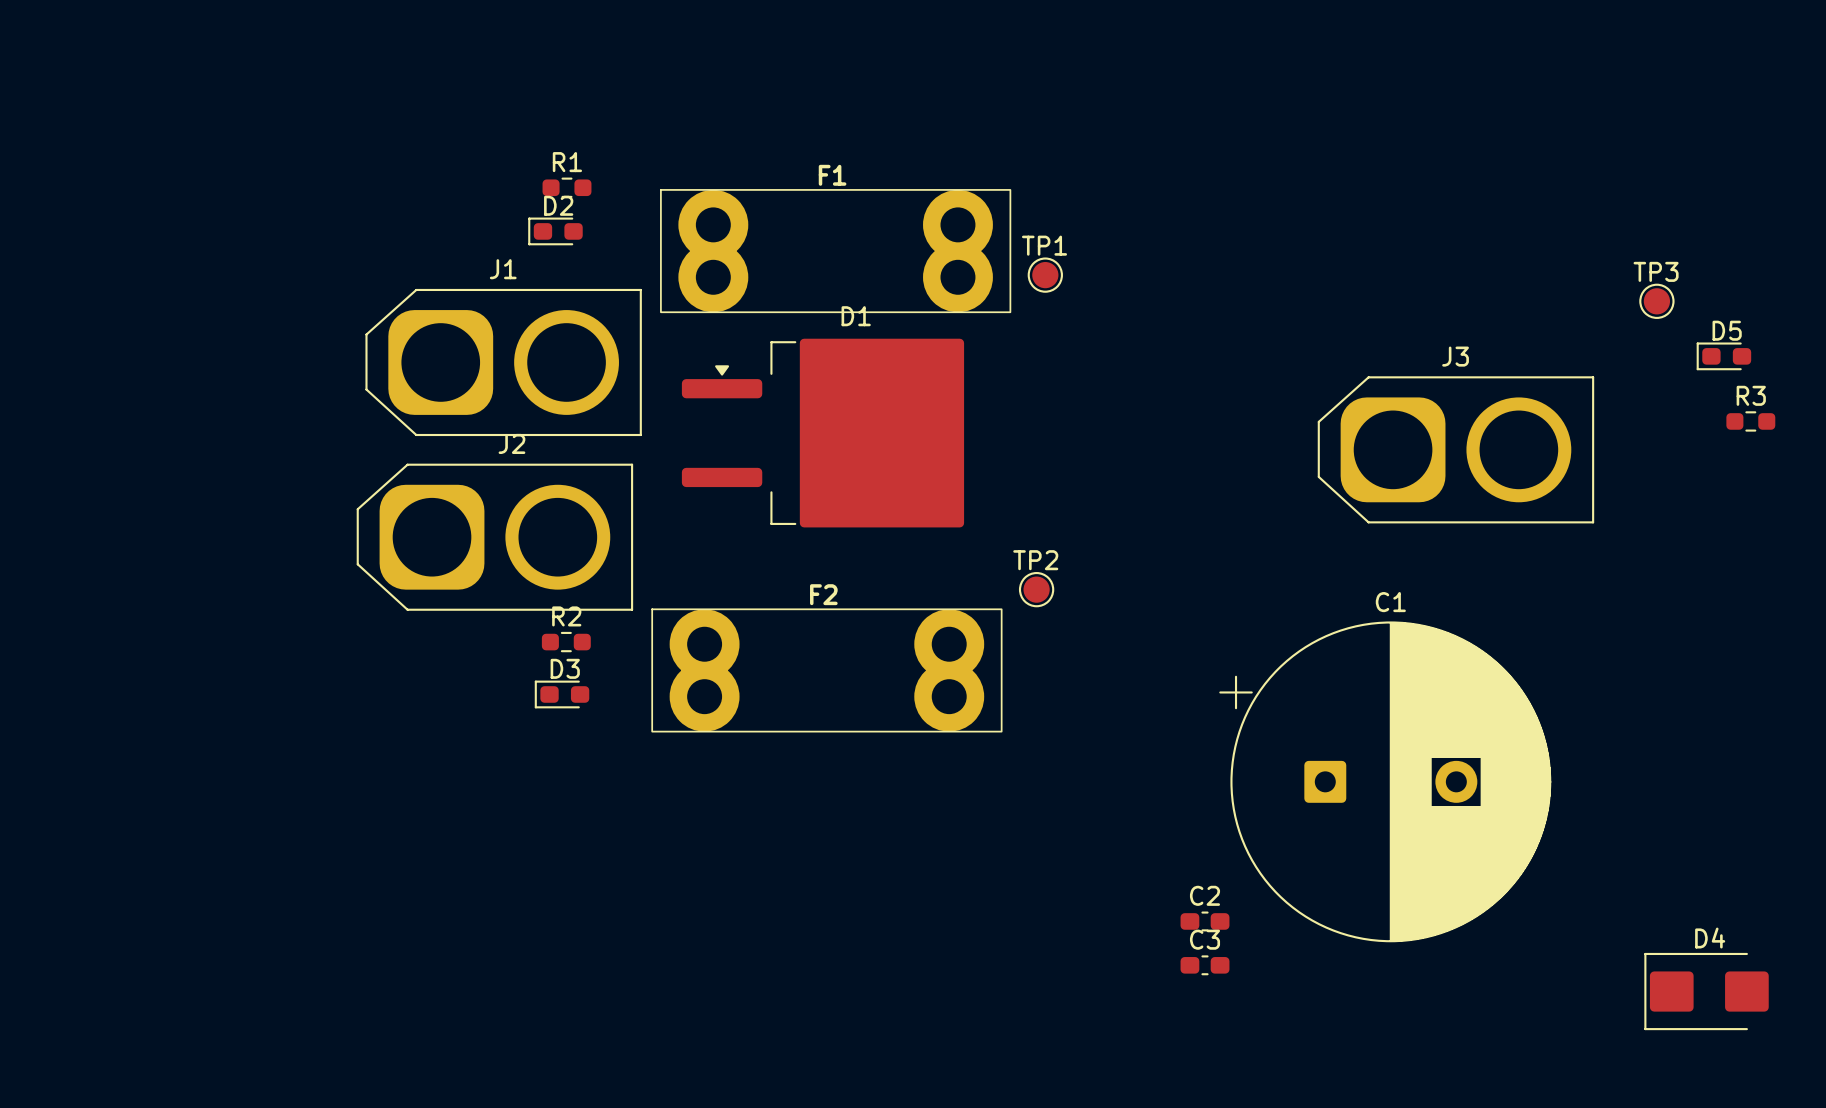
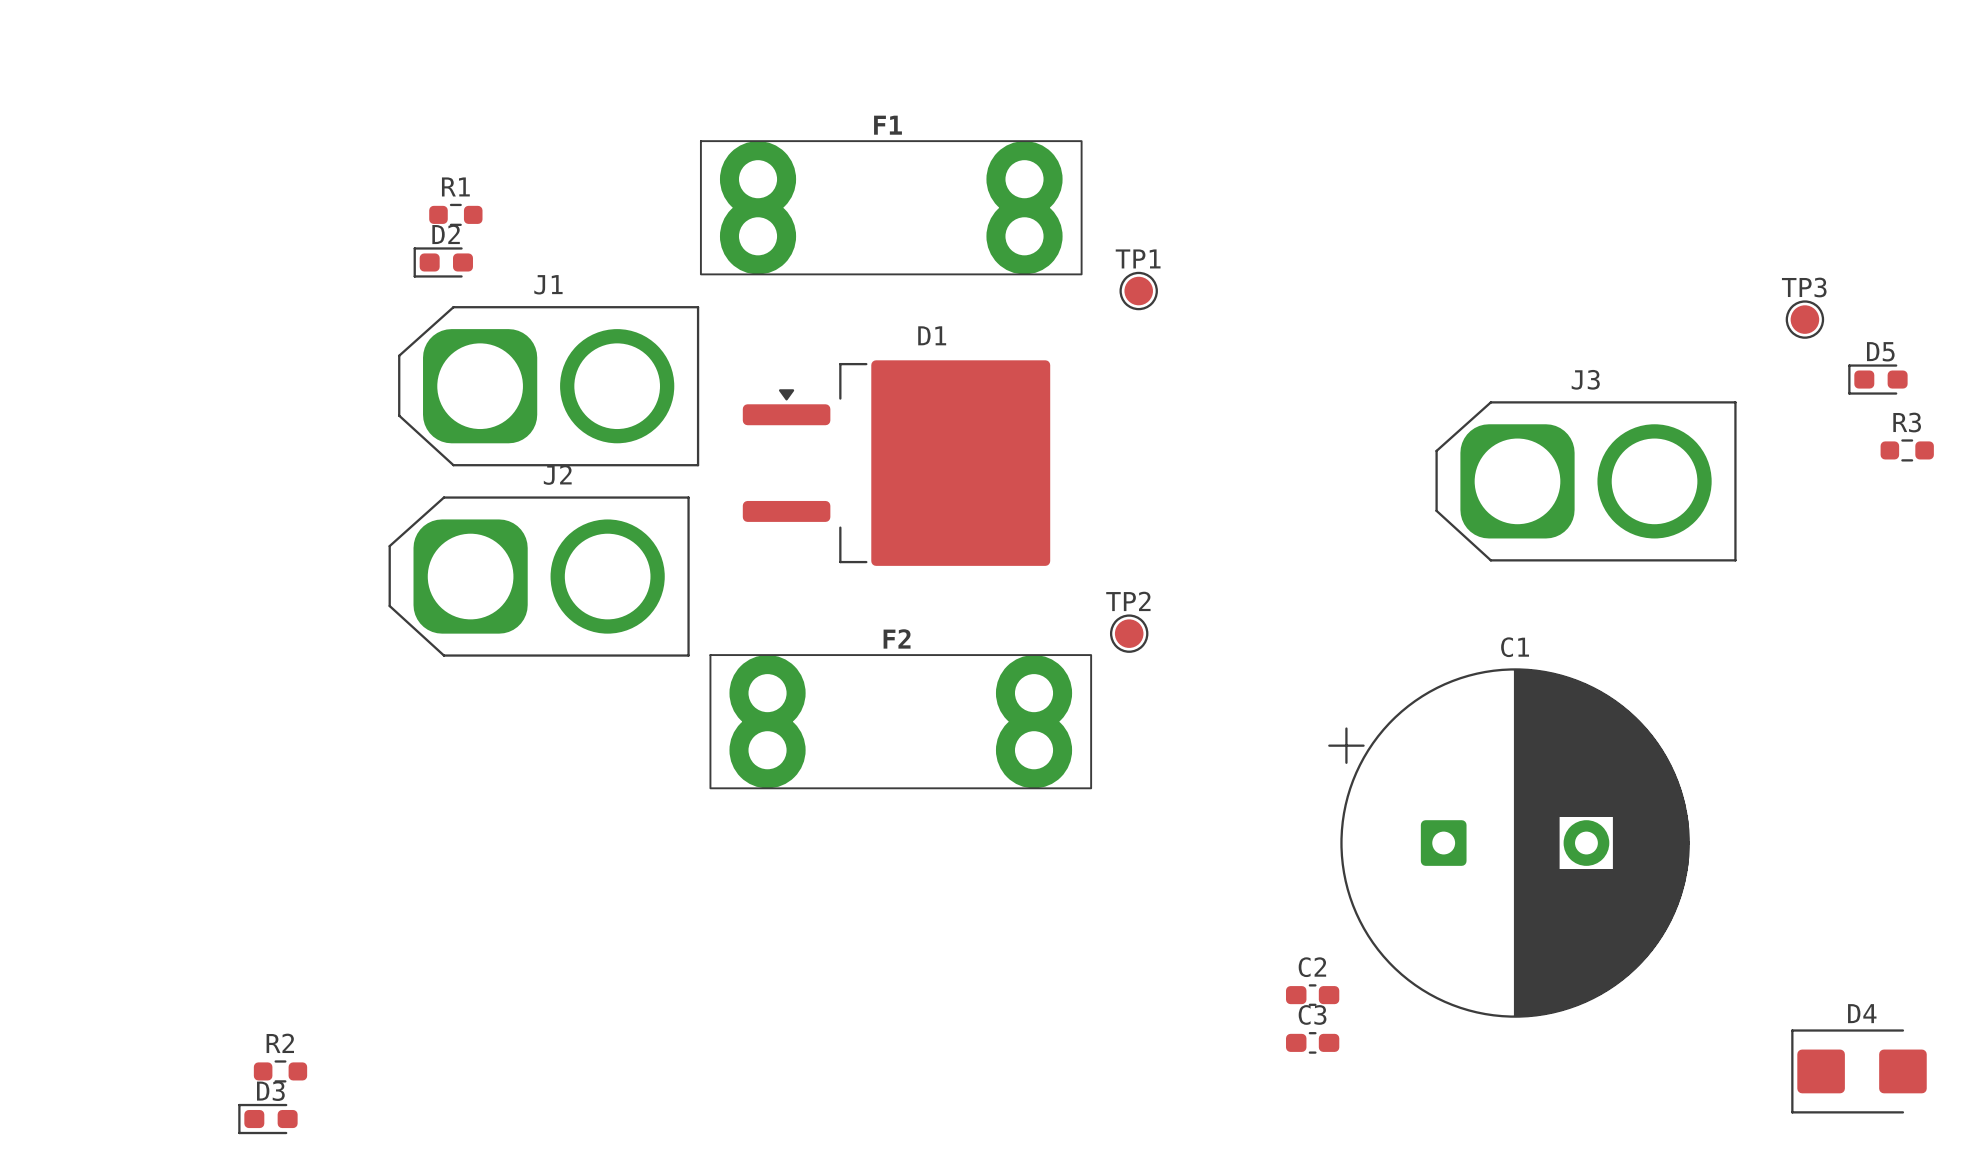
R1 position: (566, 187) -> (455, 214)
D2 position: (555, 231) -> (443, 262)
F1 position: (835, 251) -> (891, 207)
R2 position: (566, 642) -> (280, 1071)
D3 position: (562, 694) -> (267, 1119)

